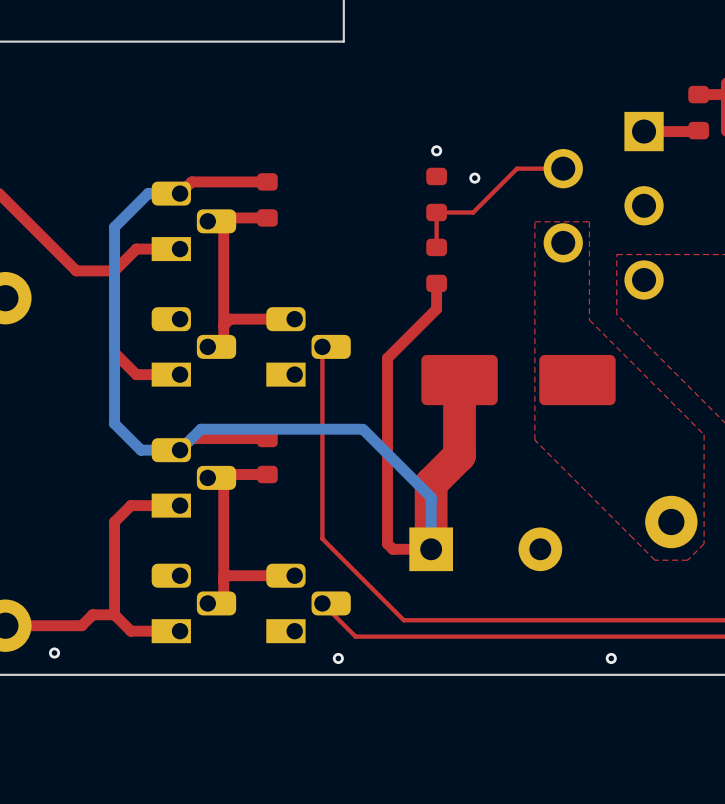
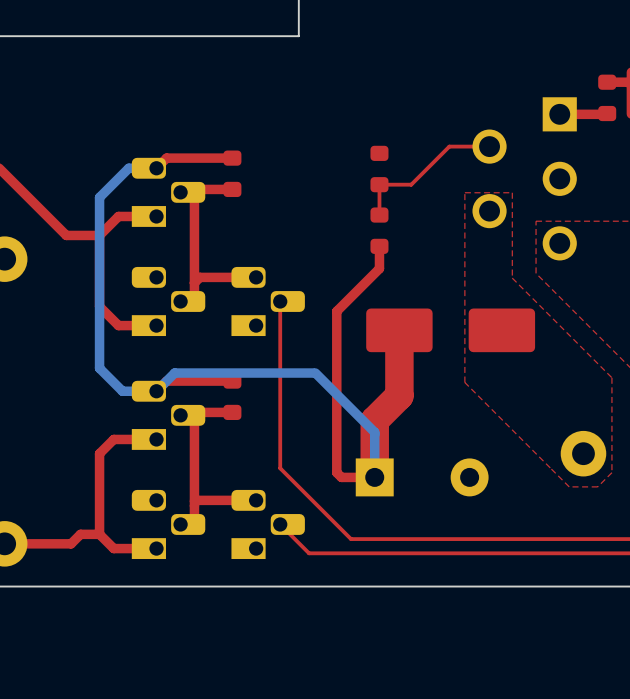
via: (436, 150) -> none
via: (474, 178) -> none
via: (54, 653) -> none
via: (338, 658) -> none
via: (611, 658) -> none

